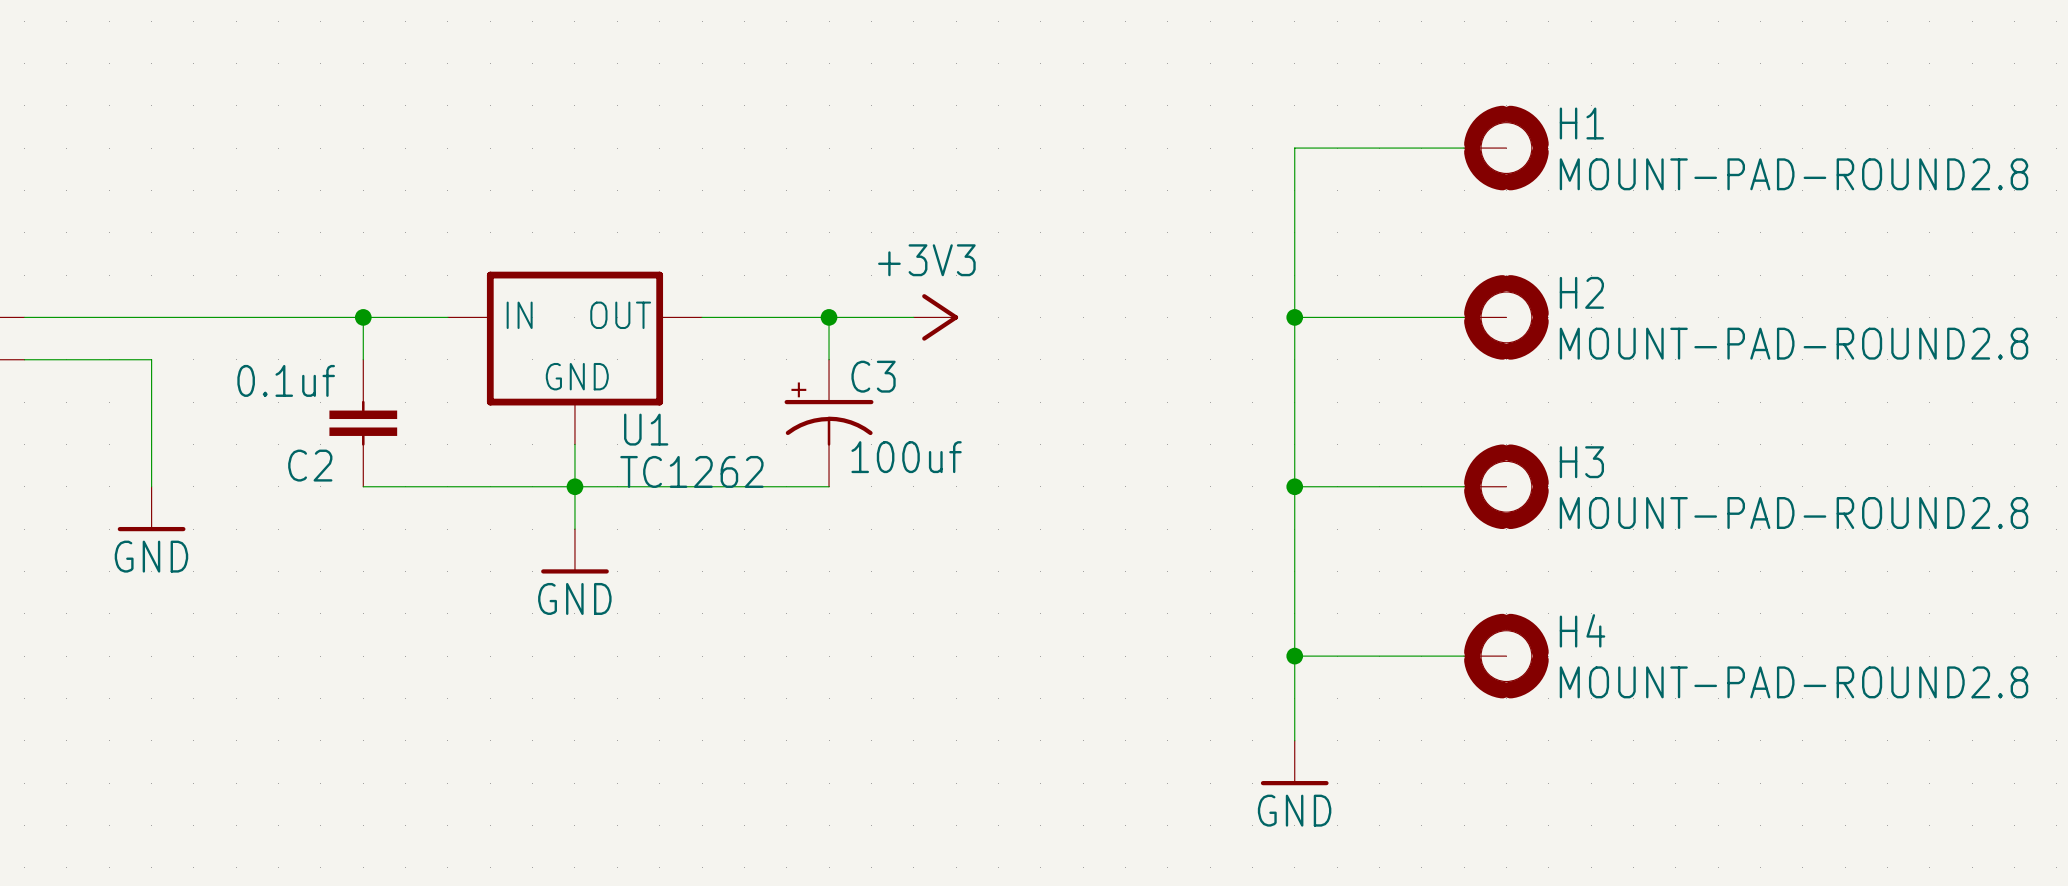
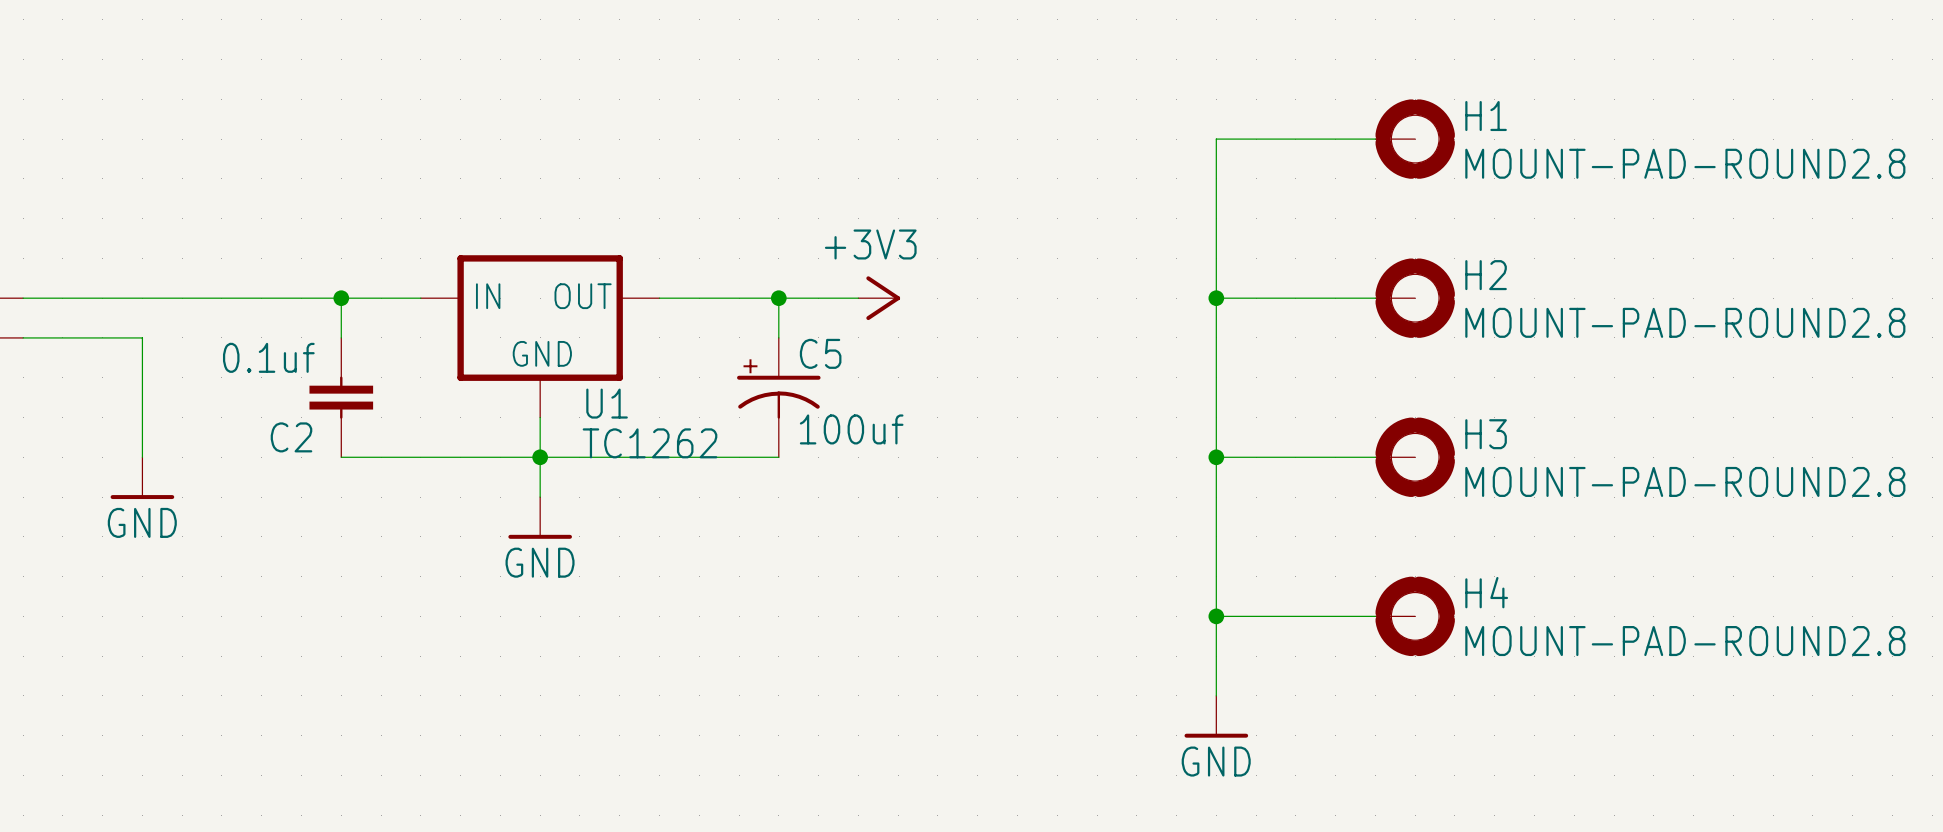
C3 name: C3 (873, 376) -> C5 (820, 353)

